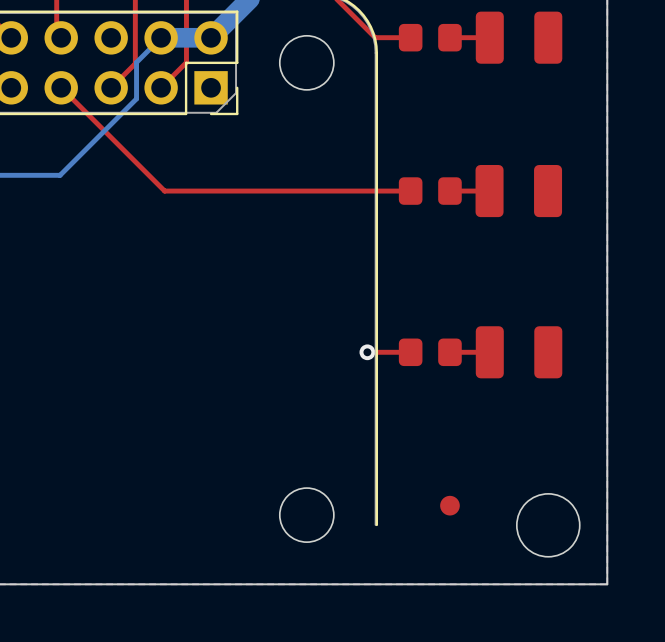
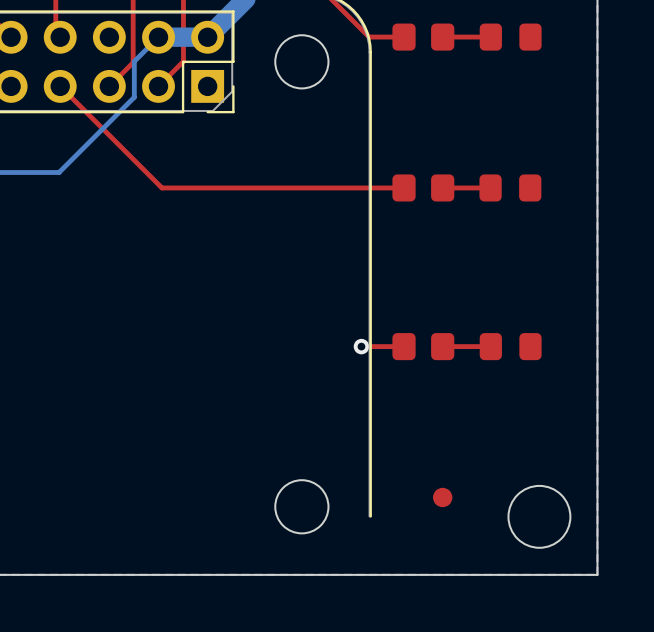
part footprint: [475, 11, 563, 64] -> [479, 23, 542, 51]
part footprint: [475, 165, 563, 218] -> [479, 174, 542, 202]
part footprint: [475, 326, 563, 379] -> [479, 333, 542, 361]

